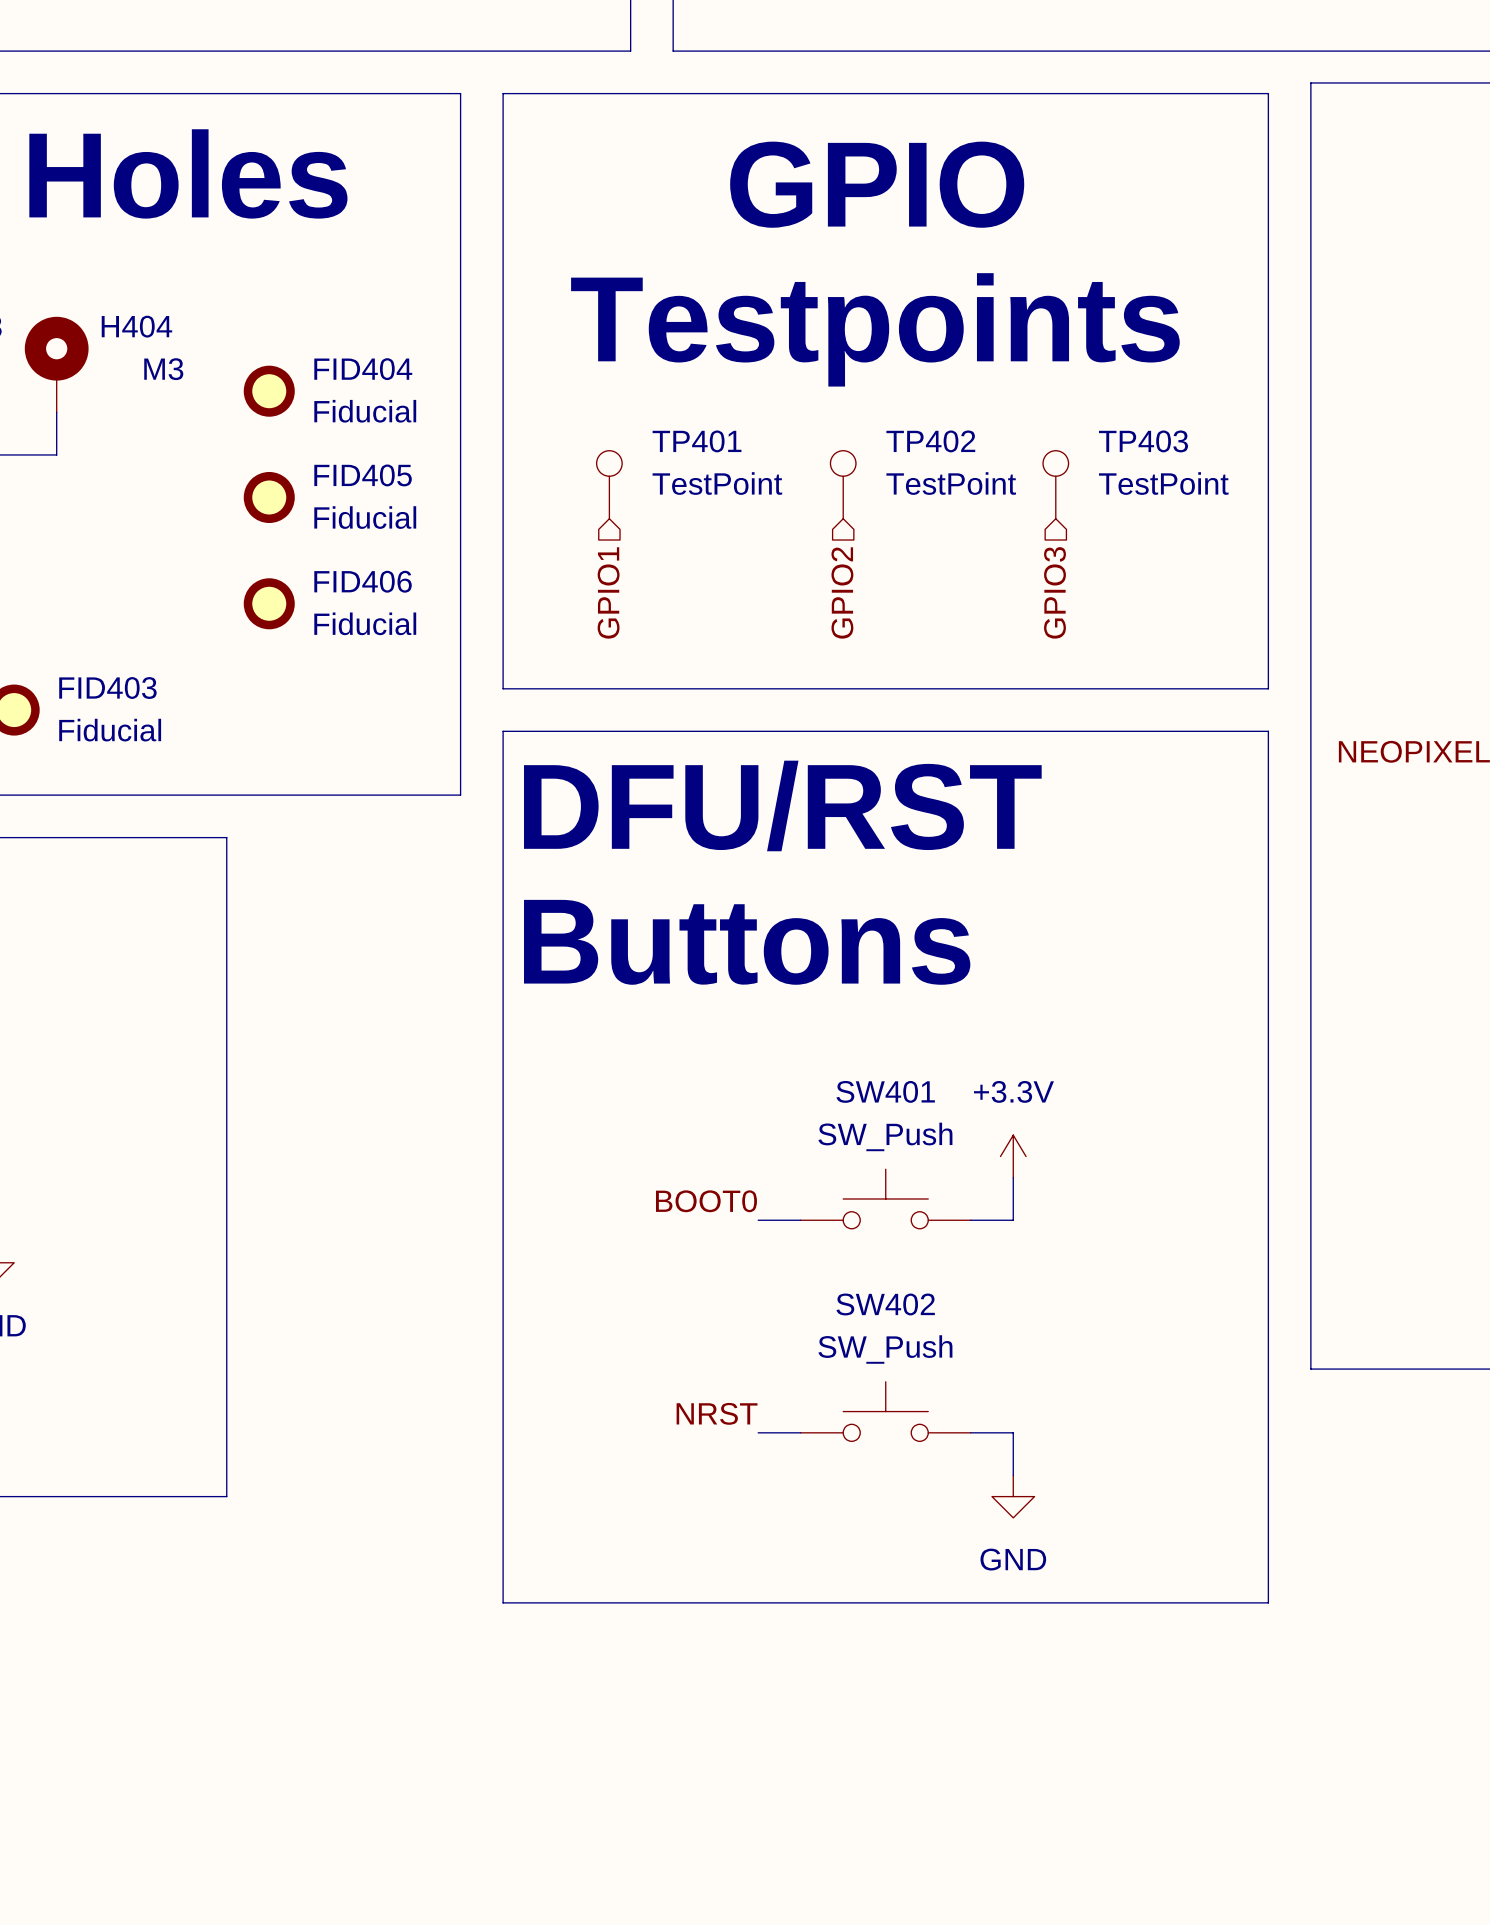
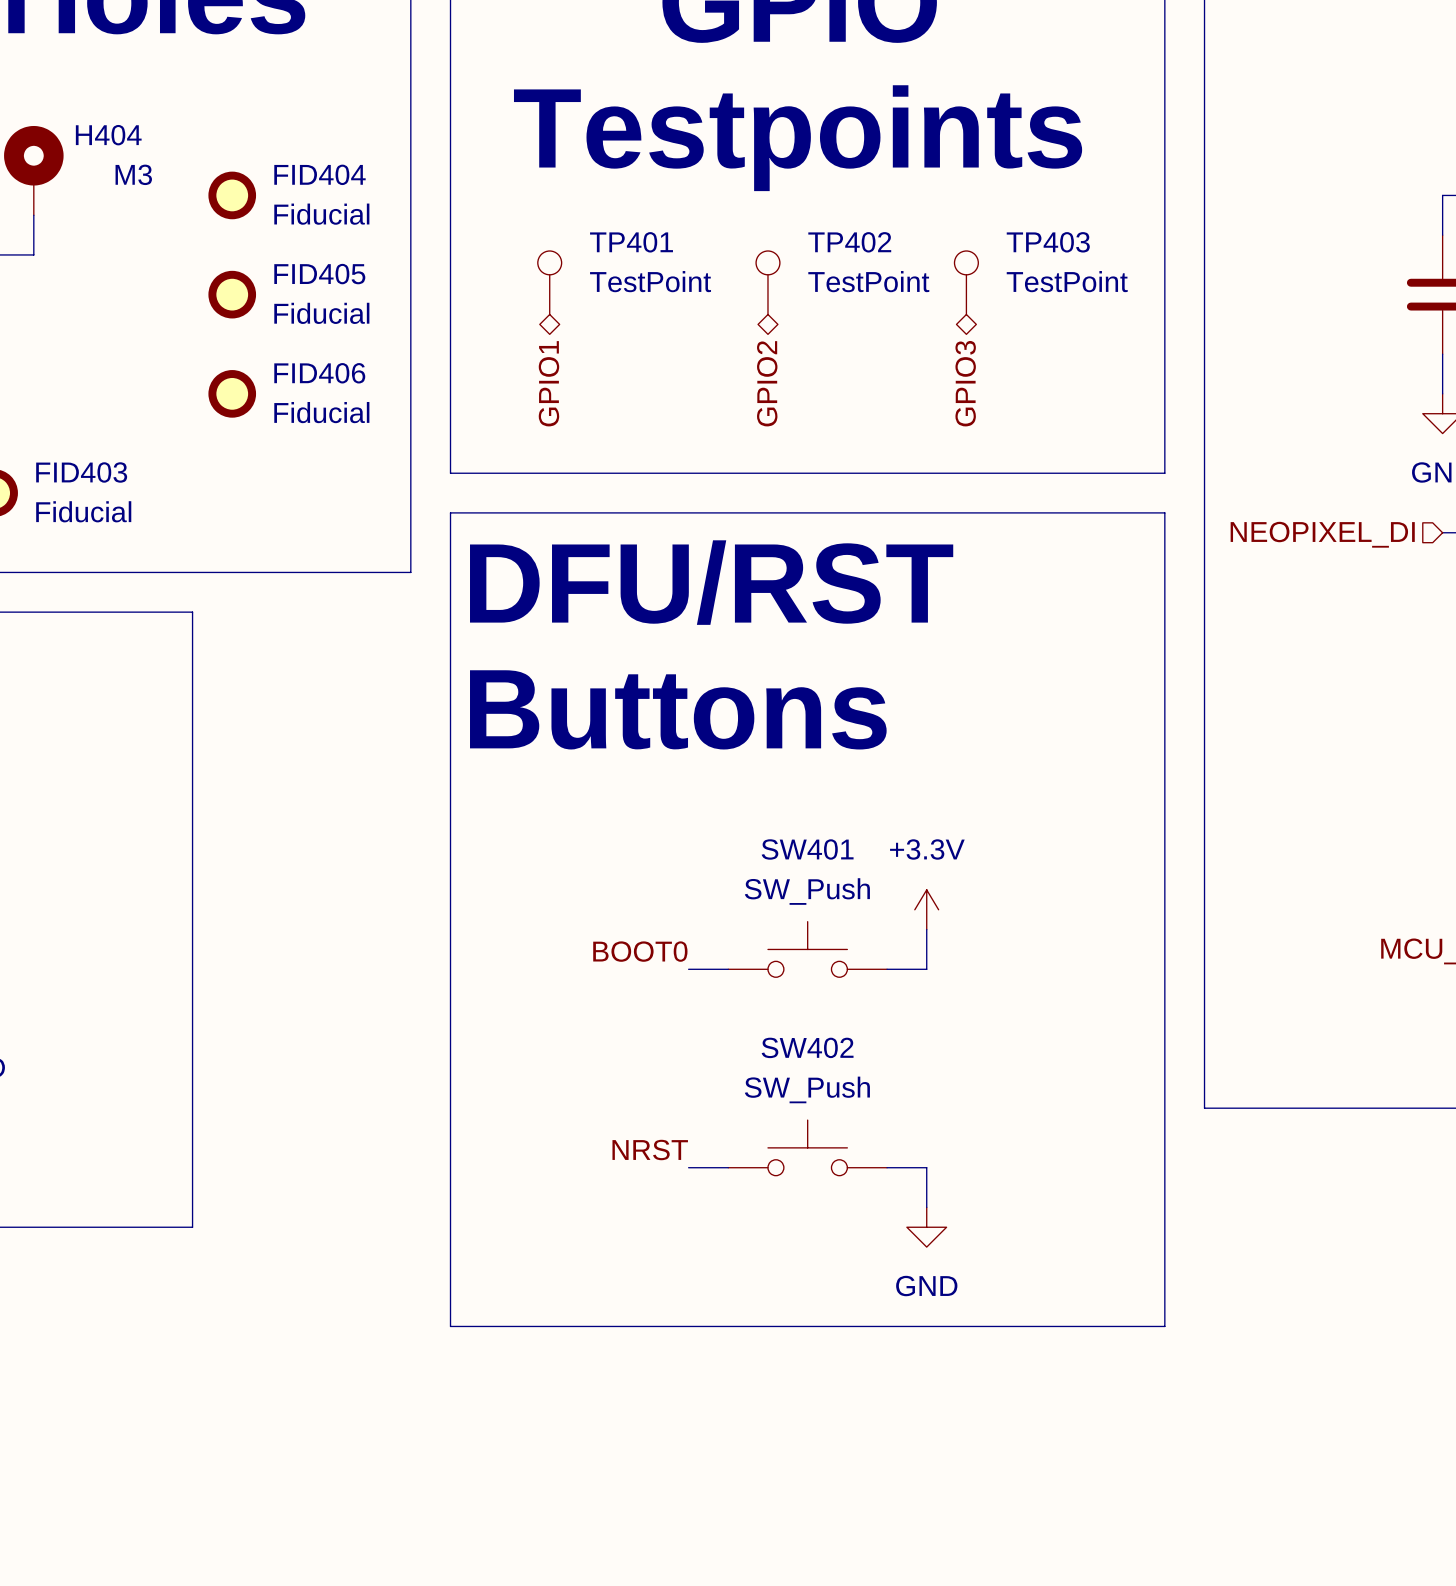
hierarchical label shape: input (608, 592) -> bidirectional (548, 383)
hierarchical label shape: input (842, 592) -> bidirectional (767, 383)
hierarchical label shape: input (1054, 592) -> bidirectional (965, 383)

